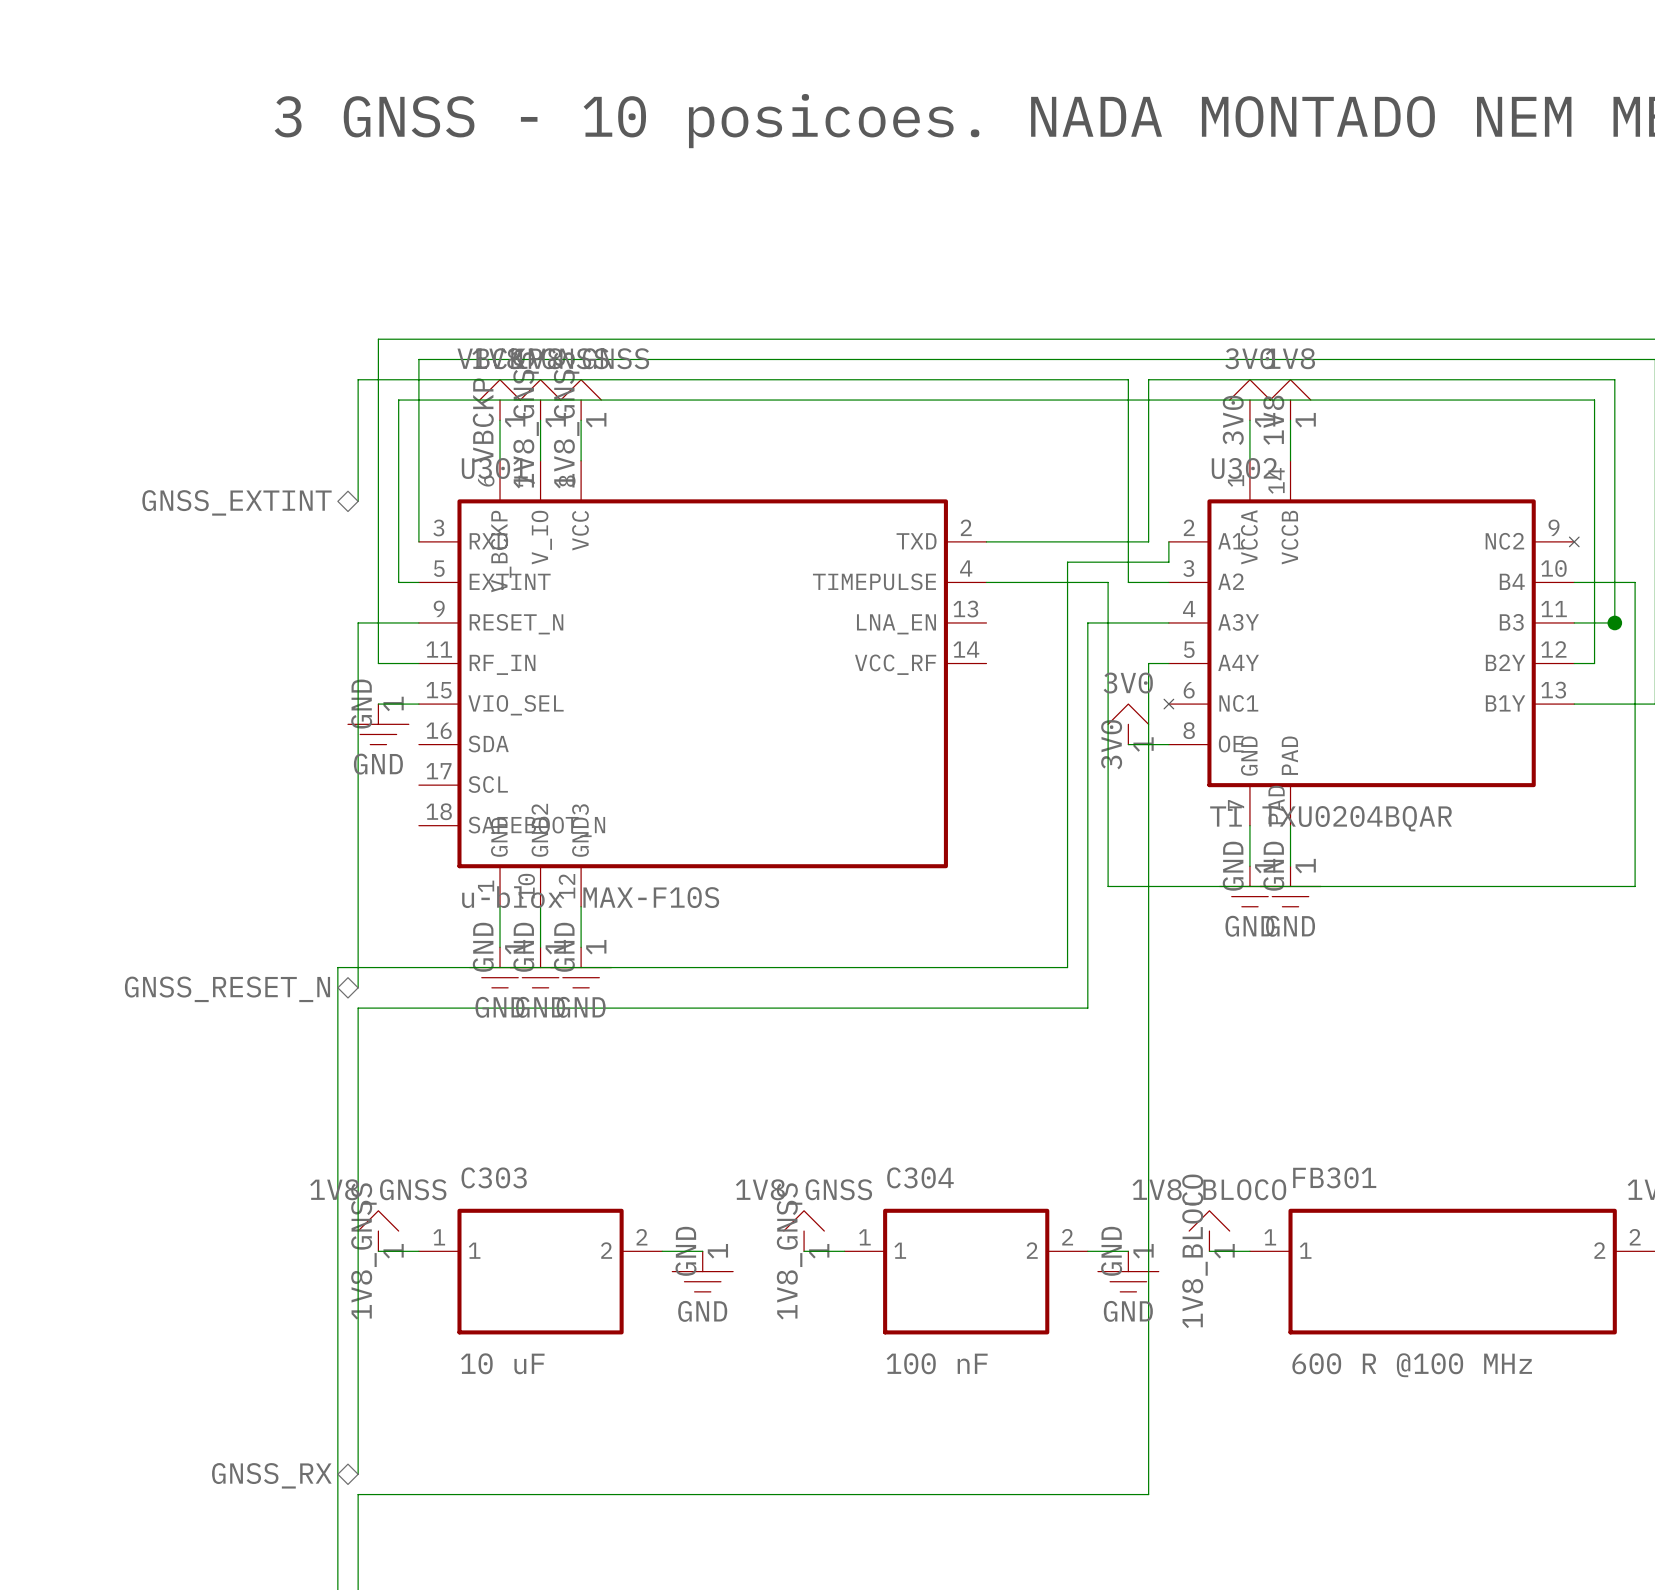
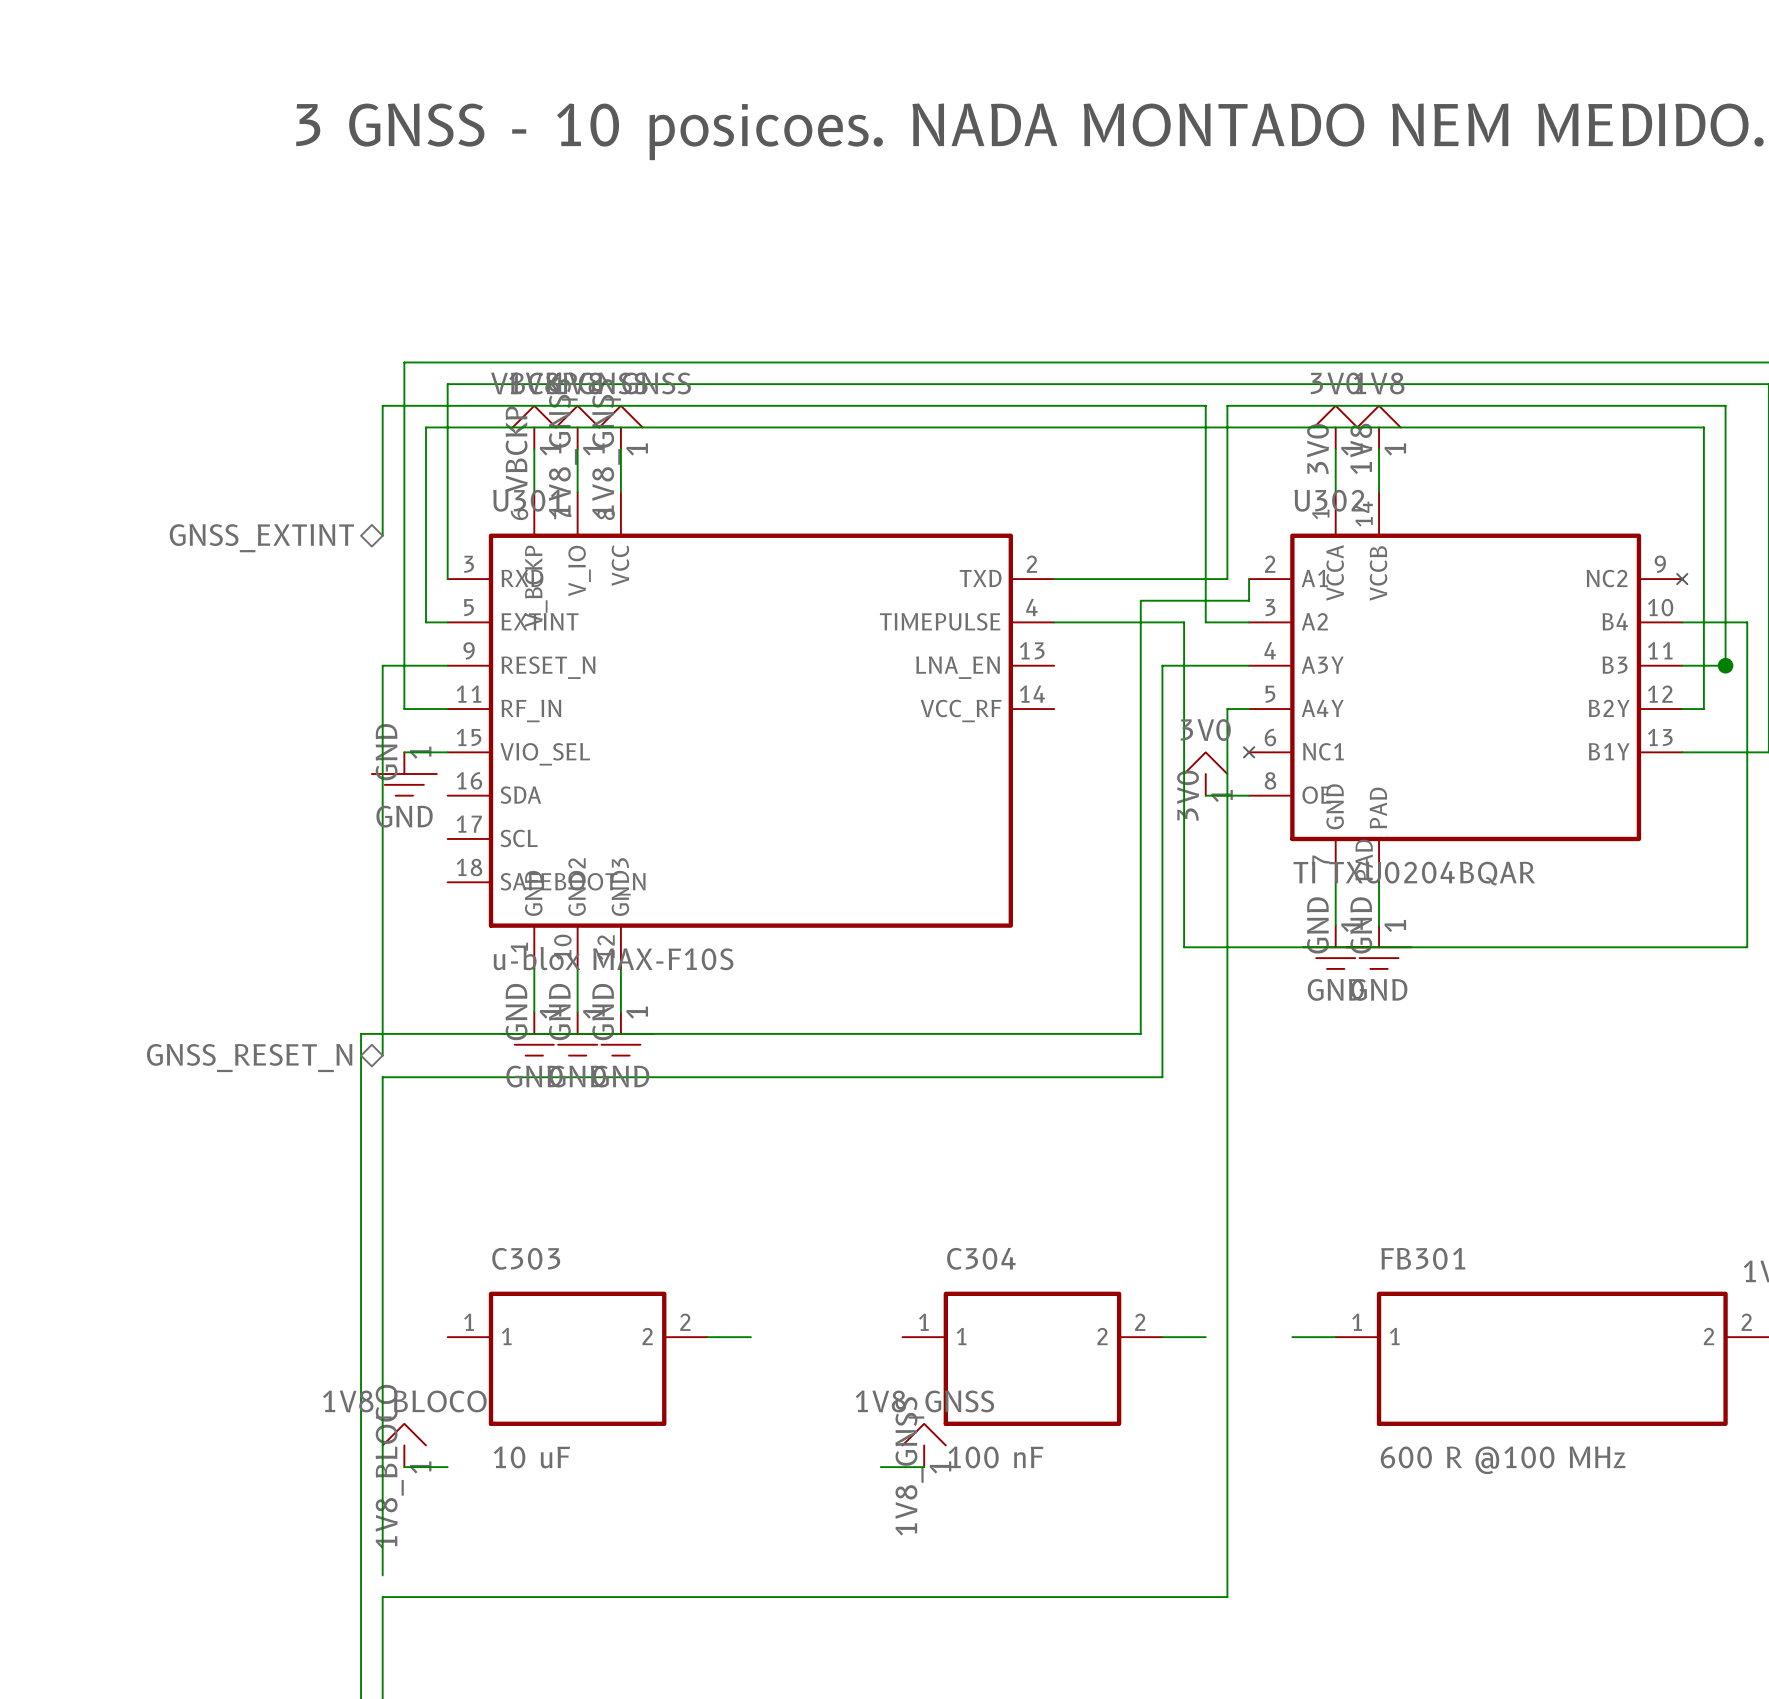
power symbol: 1V8_GNSS (378, 1231) -> none
power symbol position: 1V8_GNSS (804, 1231) -> 1V8_GNSS (924, 1445)
power symbol: 1V8_BLOCO (1209, 1231) -> none
wire: (378, 1251) (418, 1251) -> (404, 1467) (447, 1467)
wire: (804, 1251) (844, 1251) -> (880, 1467) (924, 1467)
power symbol: GND (702, 1271) -> none
power symbol: GND (1128, 1271) -> none
power symbol: none -> 1V8_BLOCO (404, 1445)
hierarchical label: GNSS_RX (271, 1475) -> none

